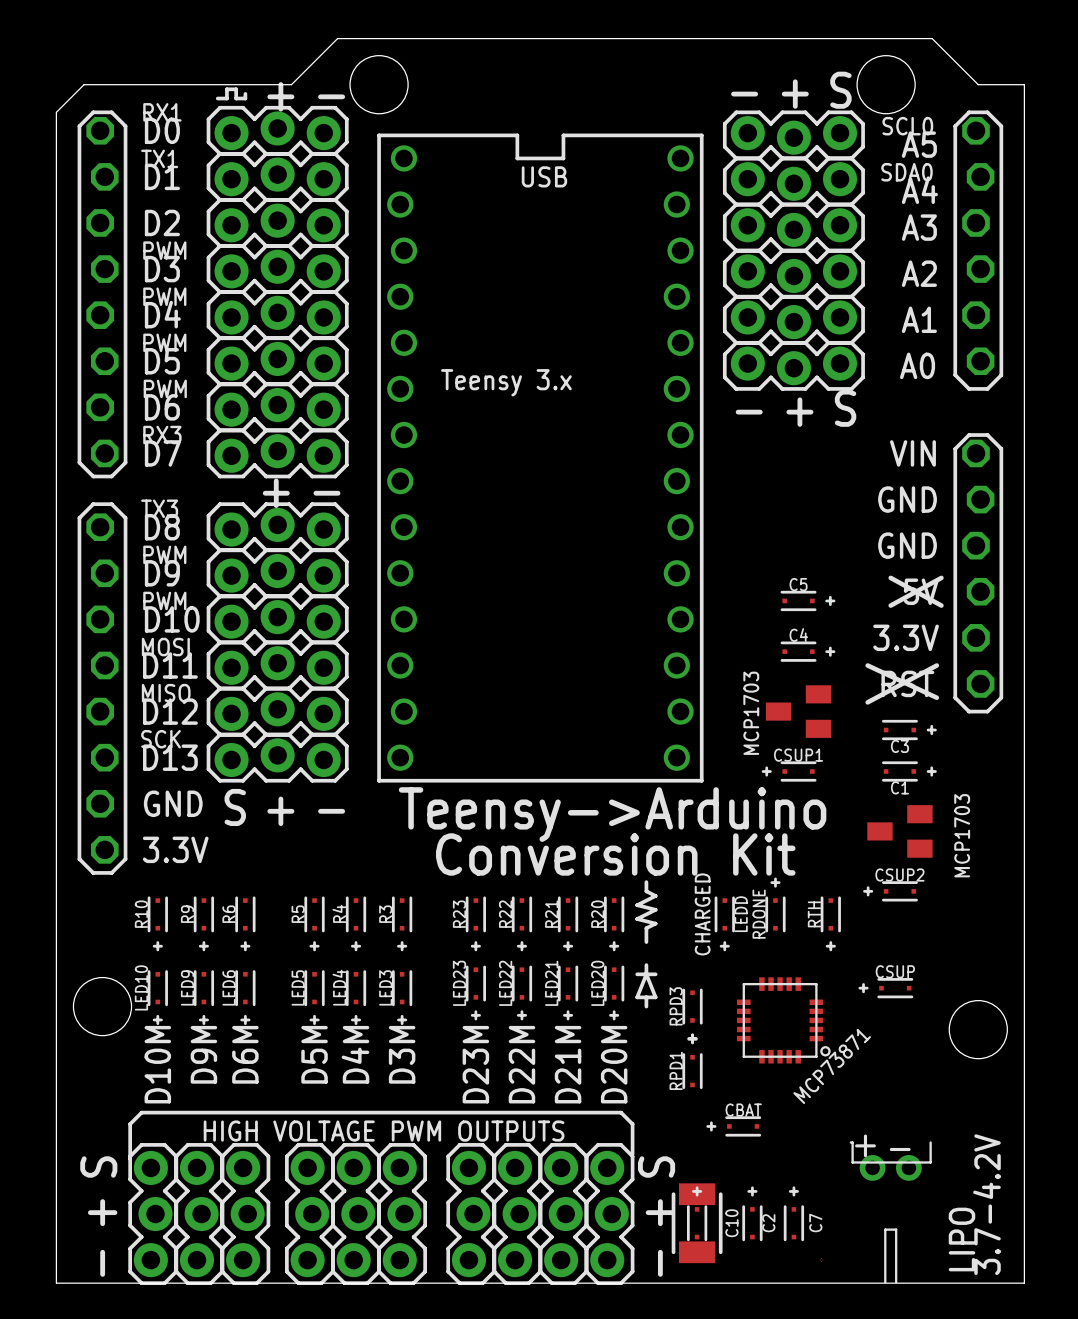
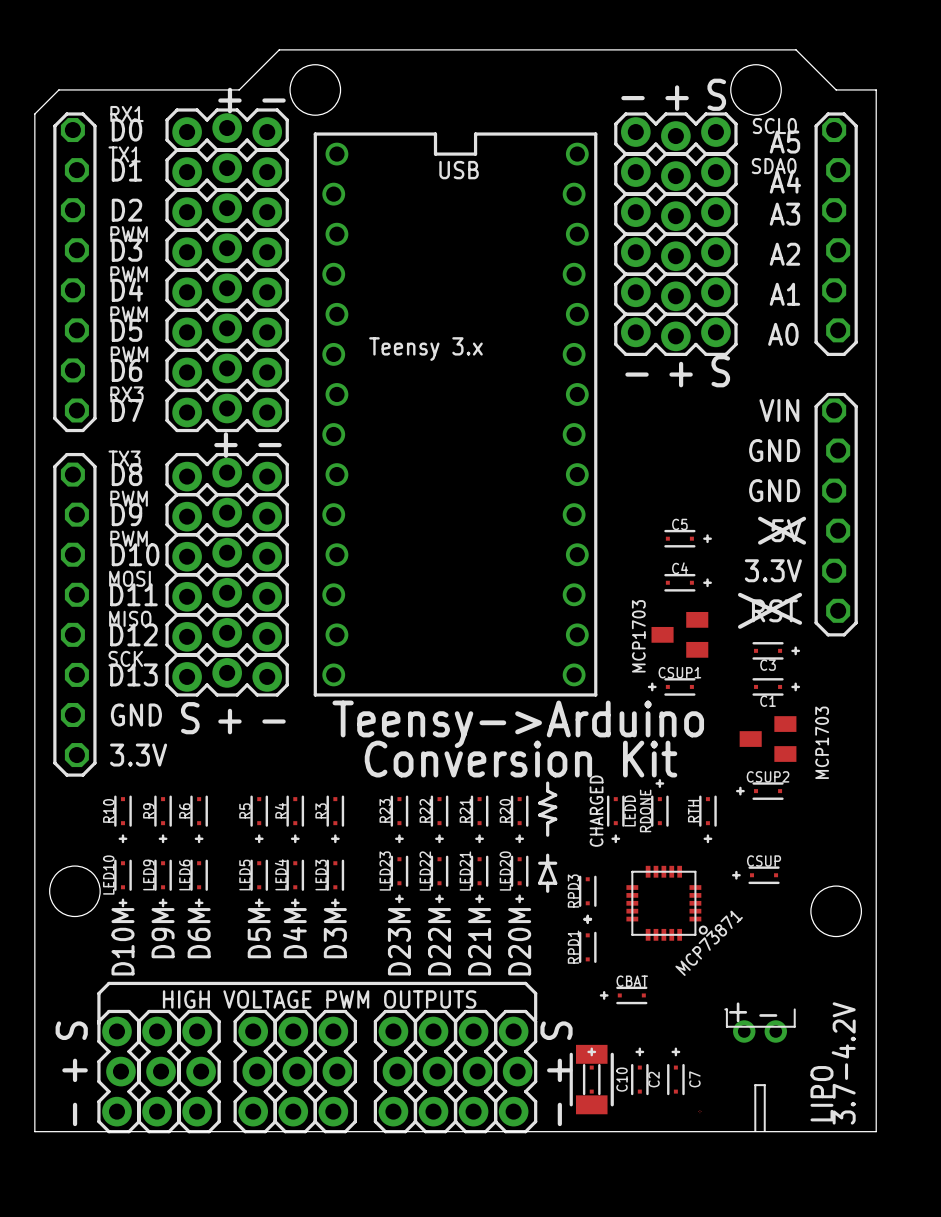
line: (245, 93) (245, 98) (236, 98) (236, 89) (226, 89) (226, 98) (217, 98) -> none

